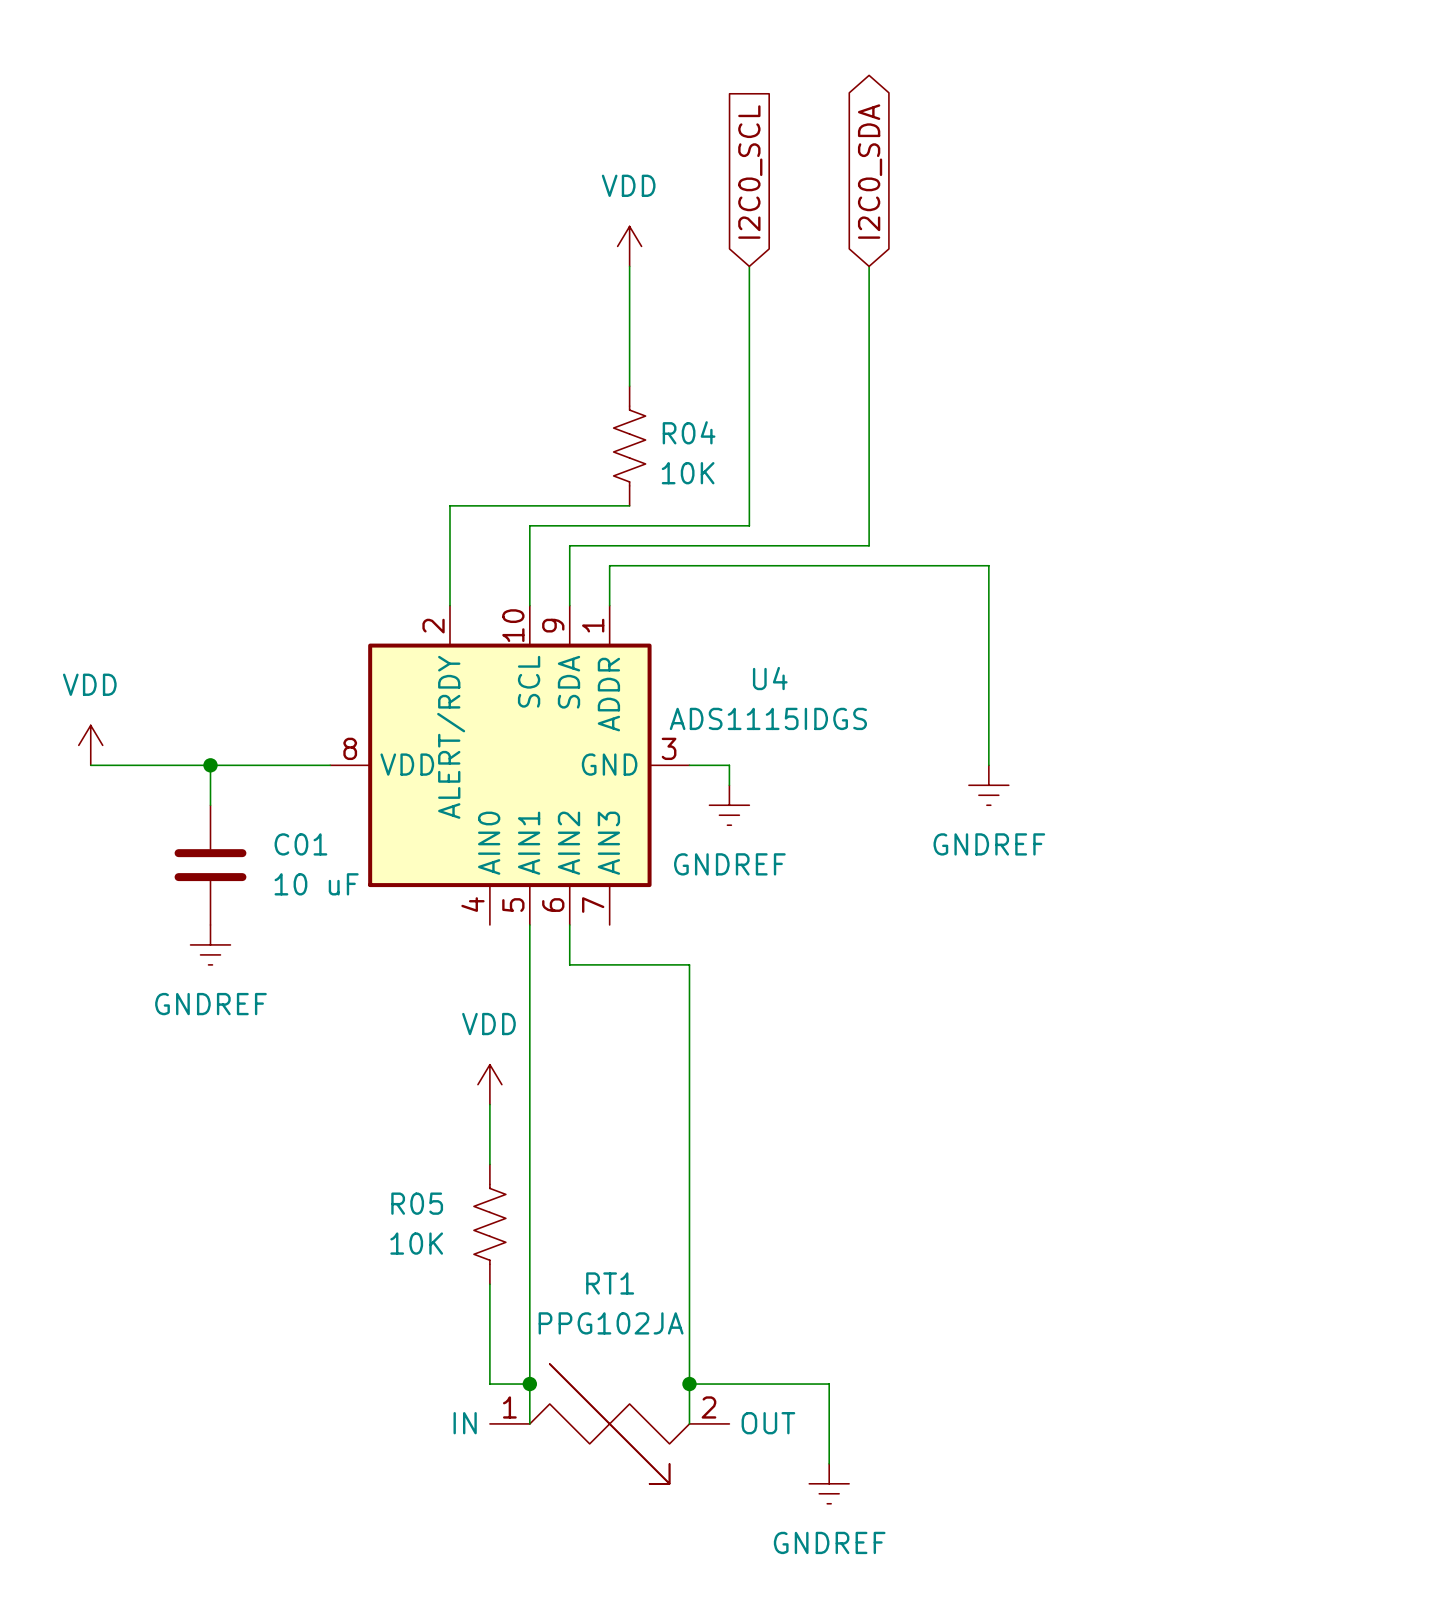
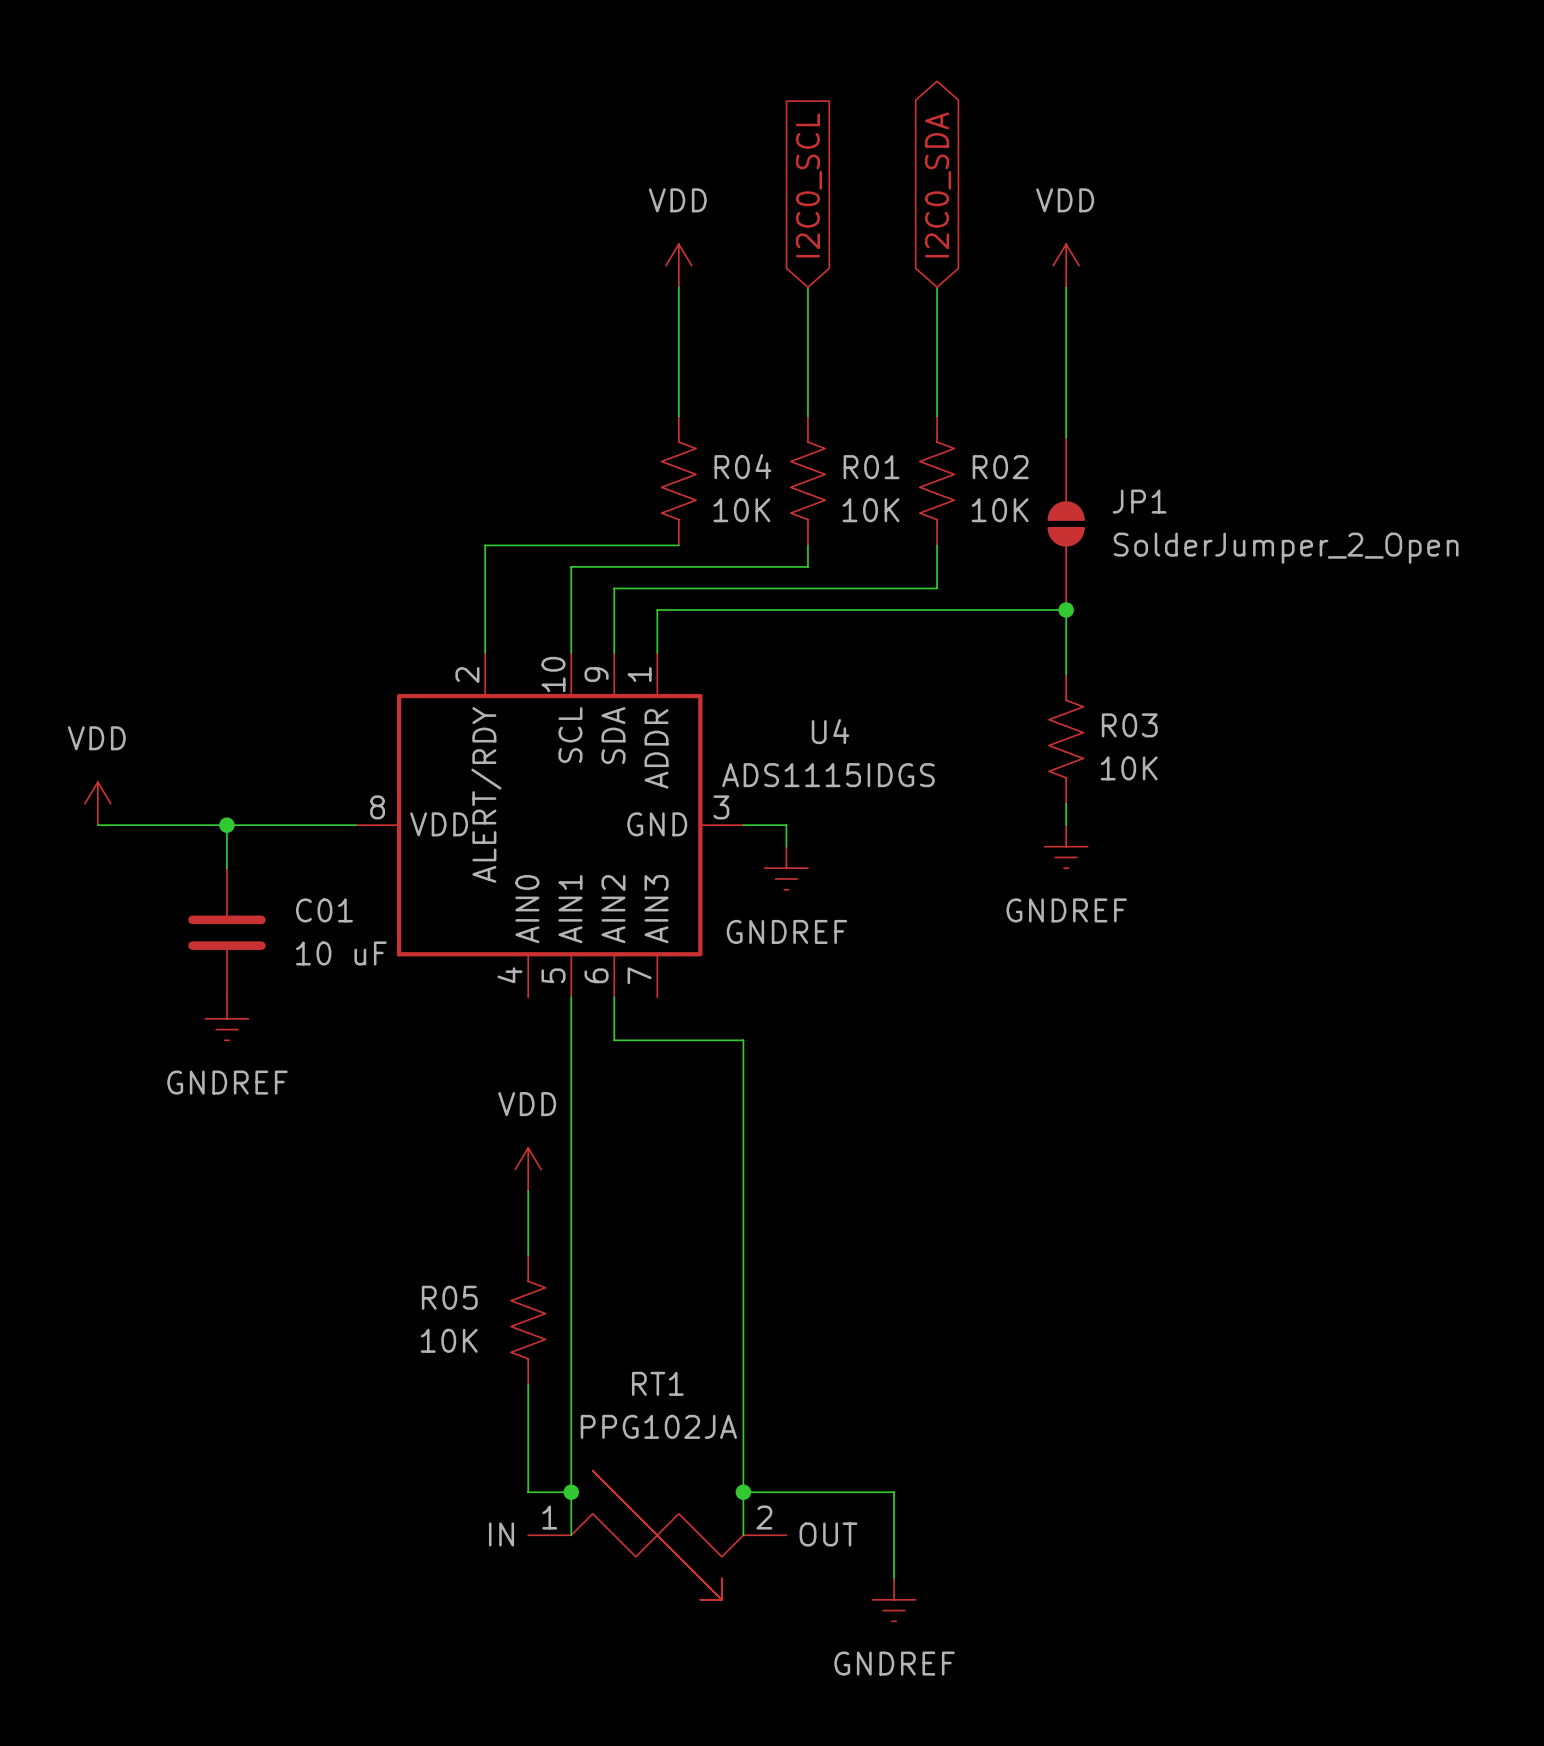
power symbol: none -> VDD (1066, 265)
wire: none -> (1066, 287) (1066, 437)
wire: (749, 386) (749, 505) -> none
wire: (869, 386) (869, 505) -> none
R01: none -> 10K (807, 480)
R02: none -> 10K (937, 480)
JP1: none -> SolderJumper_2_Open (1066, 523)
junction: none -> (1066, 609)
wire: (988, 625) (988, 745) -> none
R03: none -> 10K (1066, 739)

